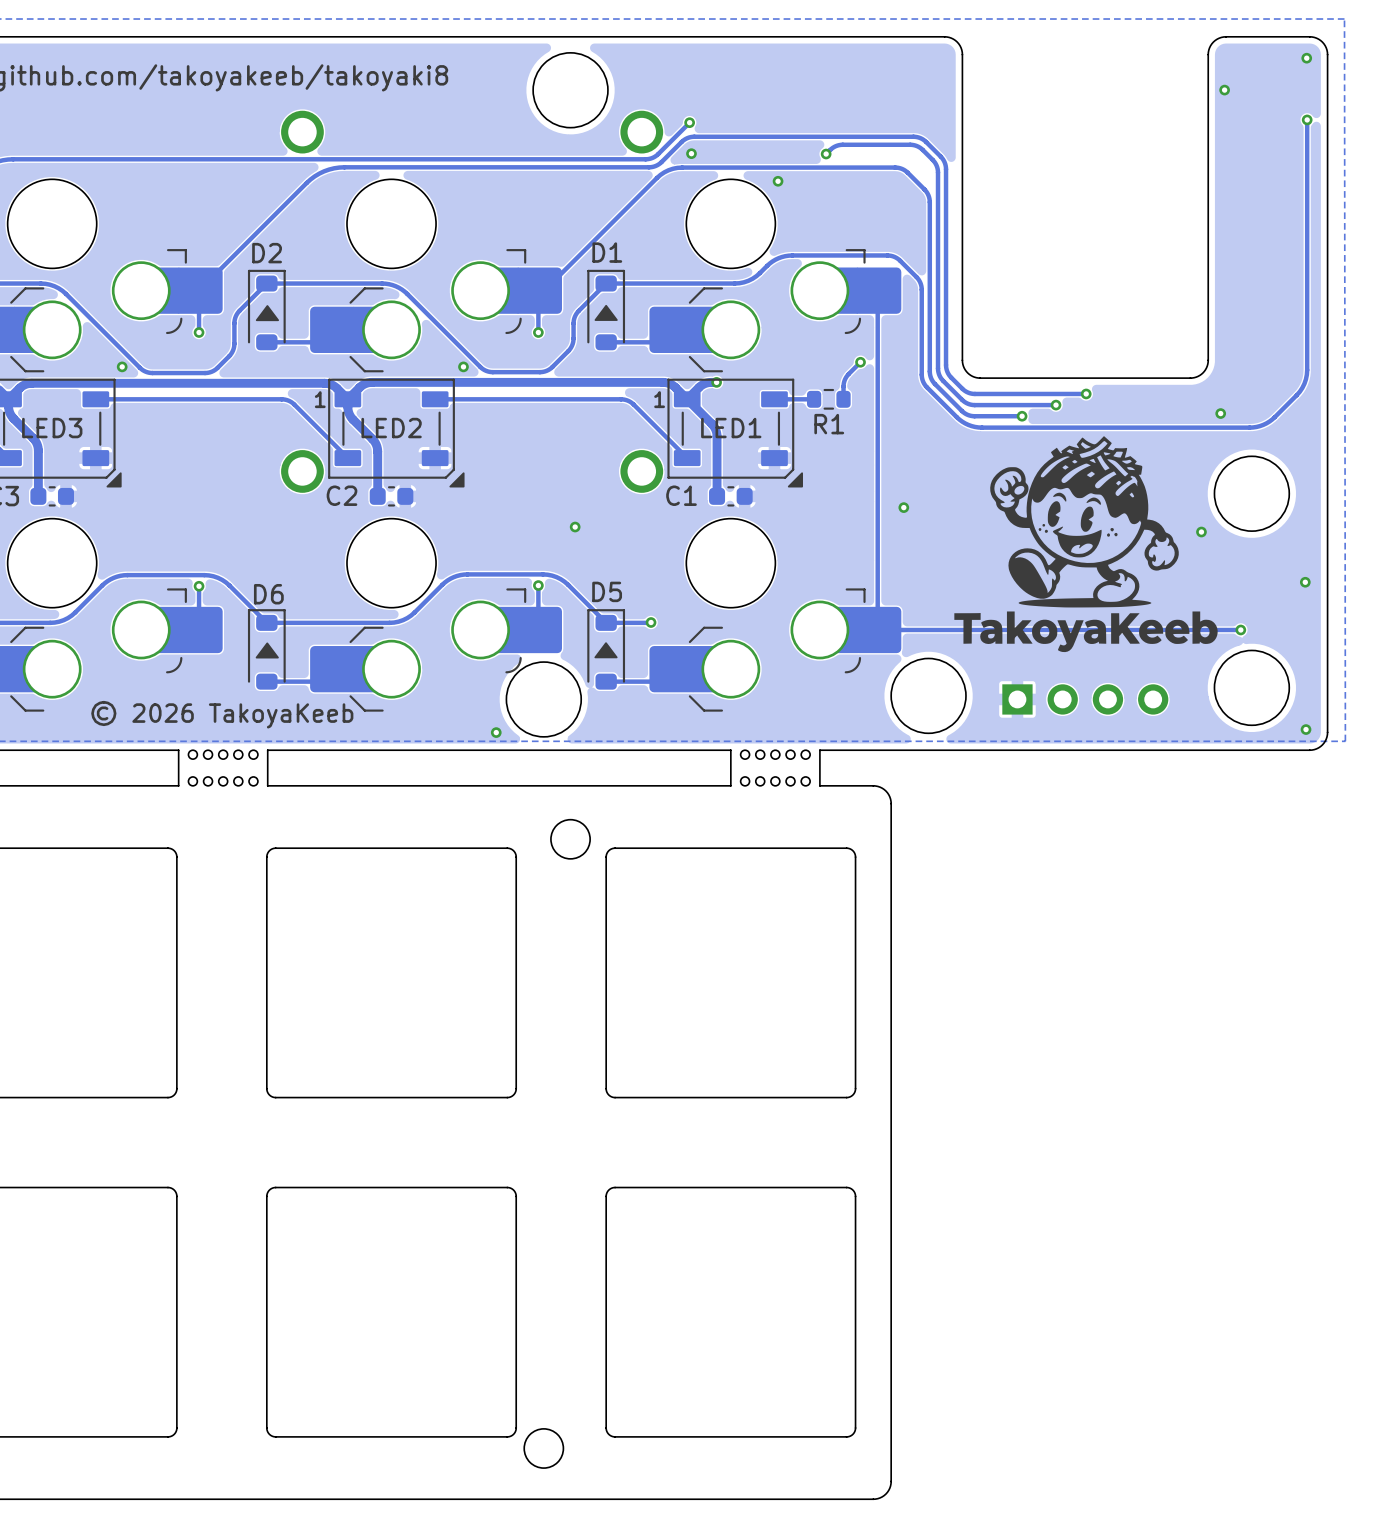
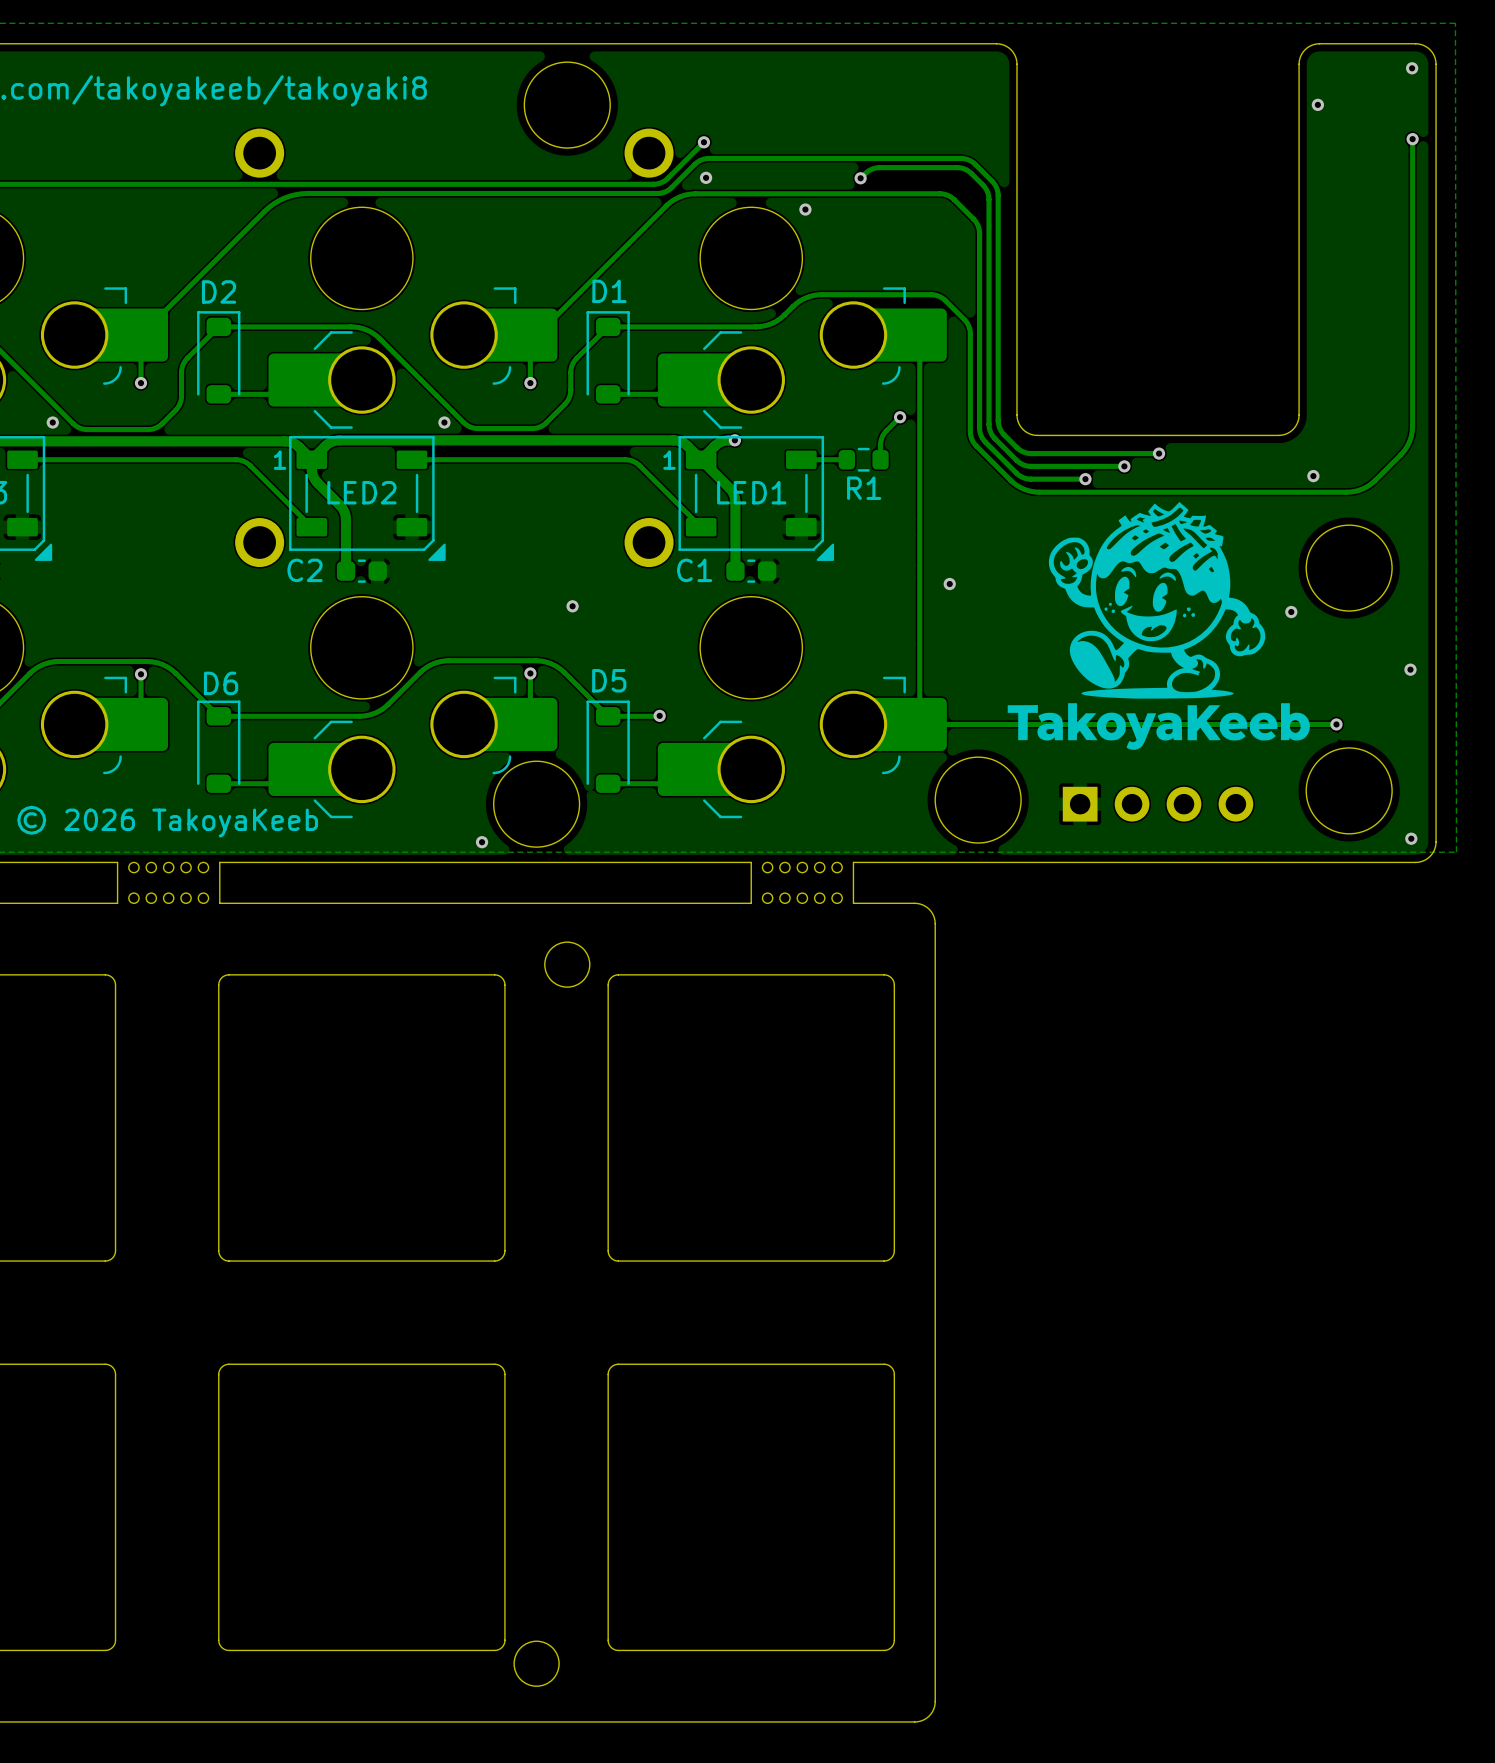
drawing: [594, 304, 618, 321] -> none
drawing: [255, 305, 280, 322] -> none
drawing: [255, 642, 279, 659] -> none
drawing: [594, 642, 618, 659] -> none

